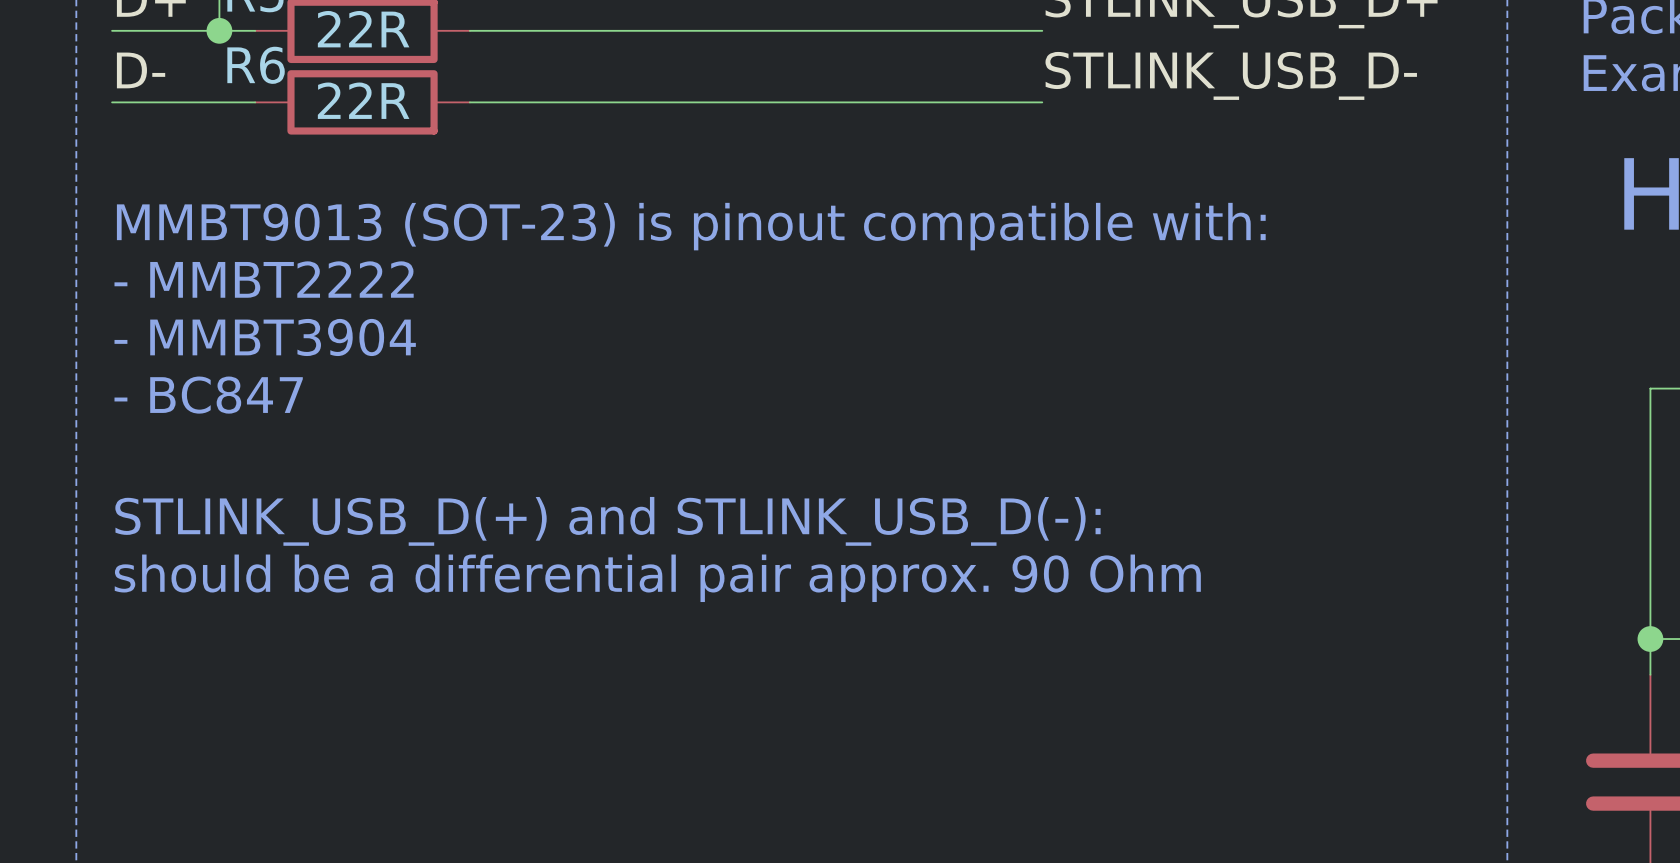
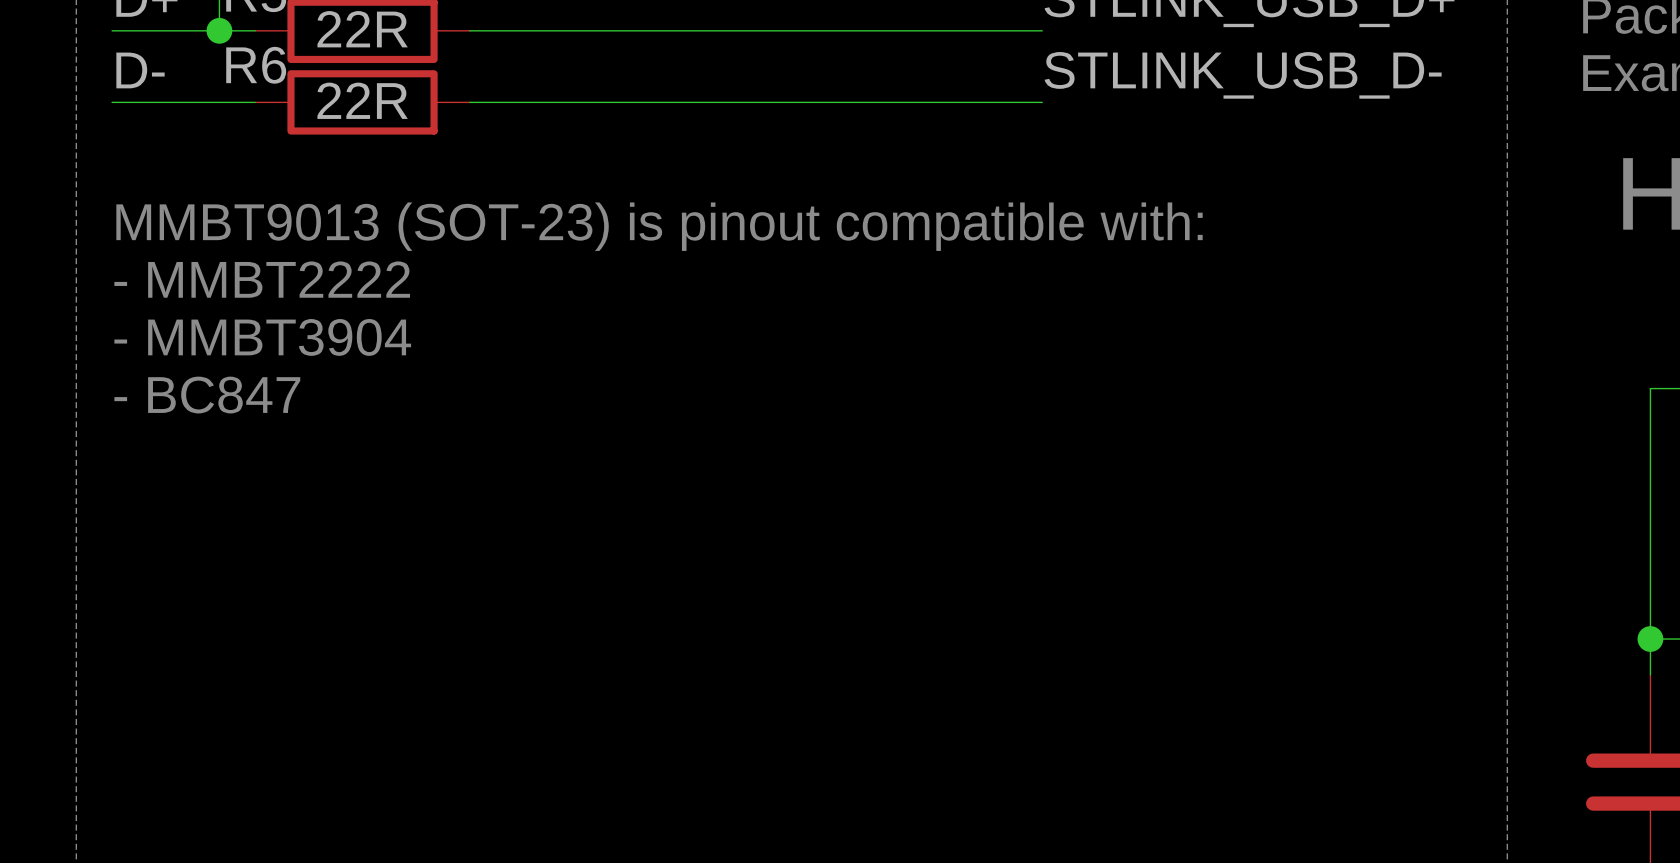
text: STLINK_USB_D(+) and STLINK_USB_D(-): (607, 521) -> none
text: should be a differential pair approx. 90 Ohm (657, 578) -> none

